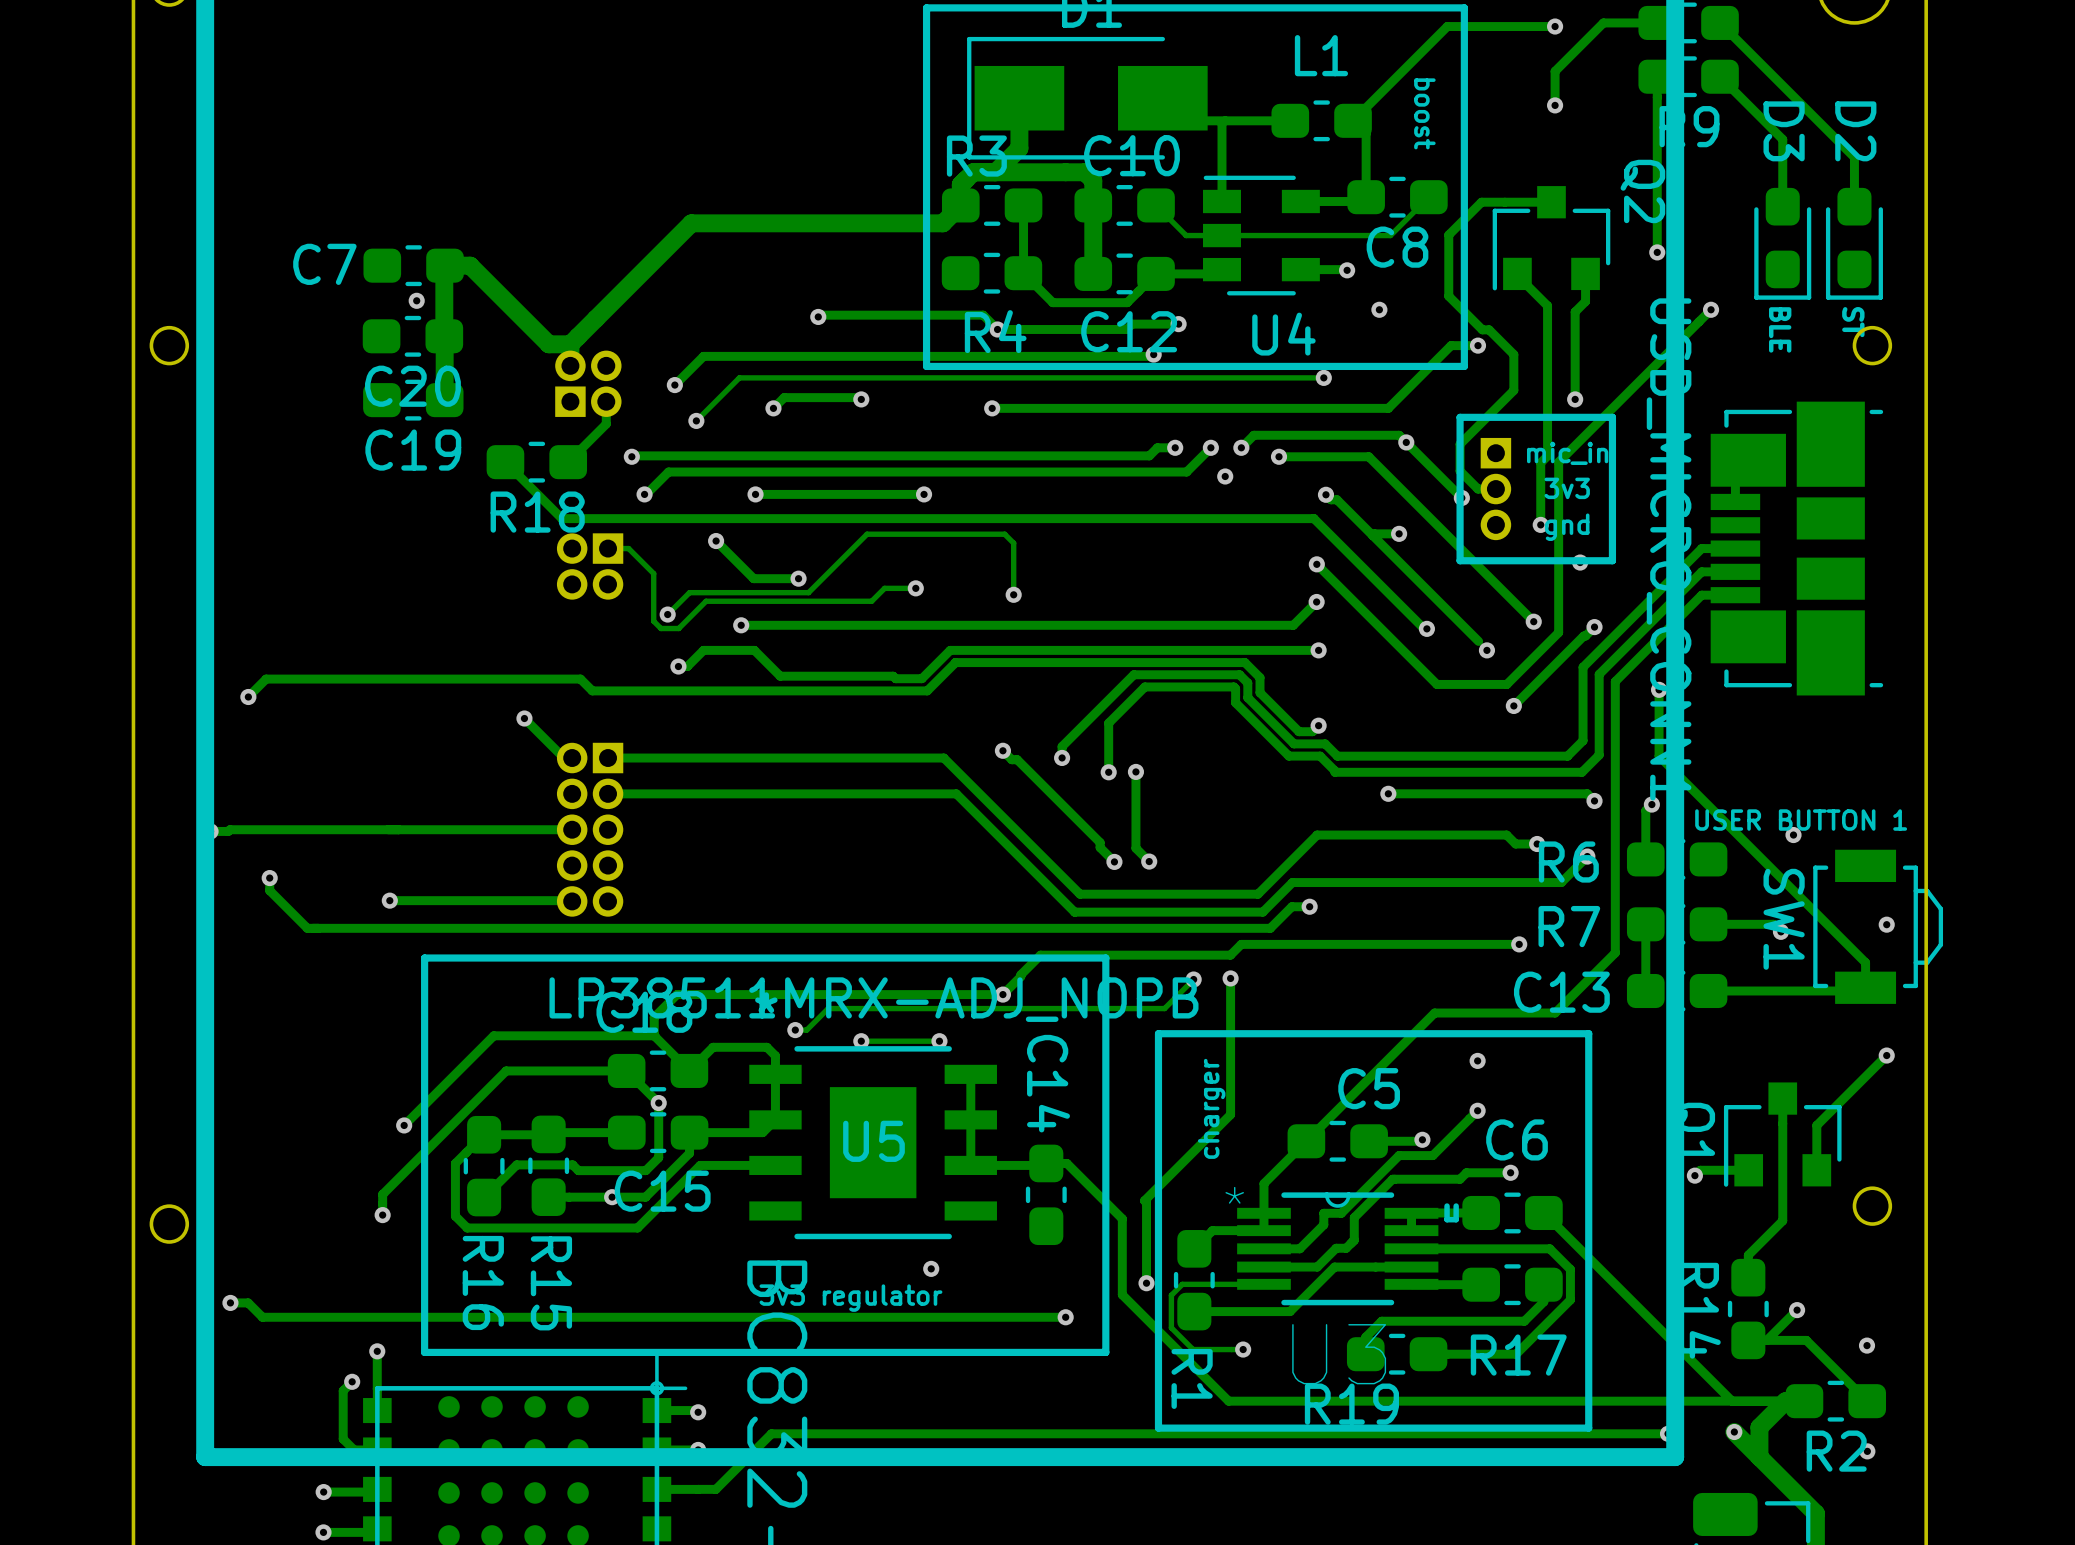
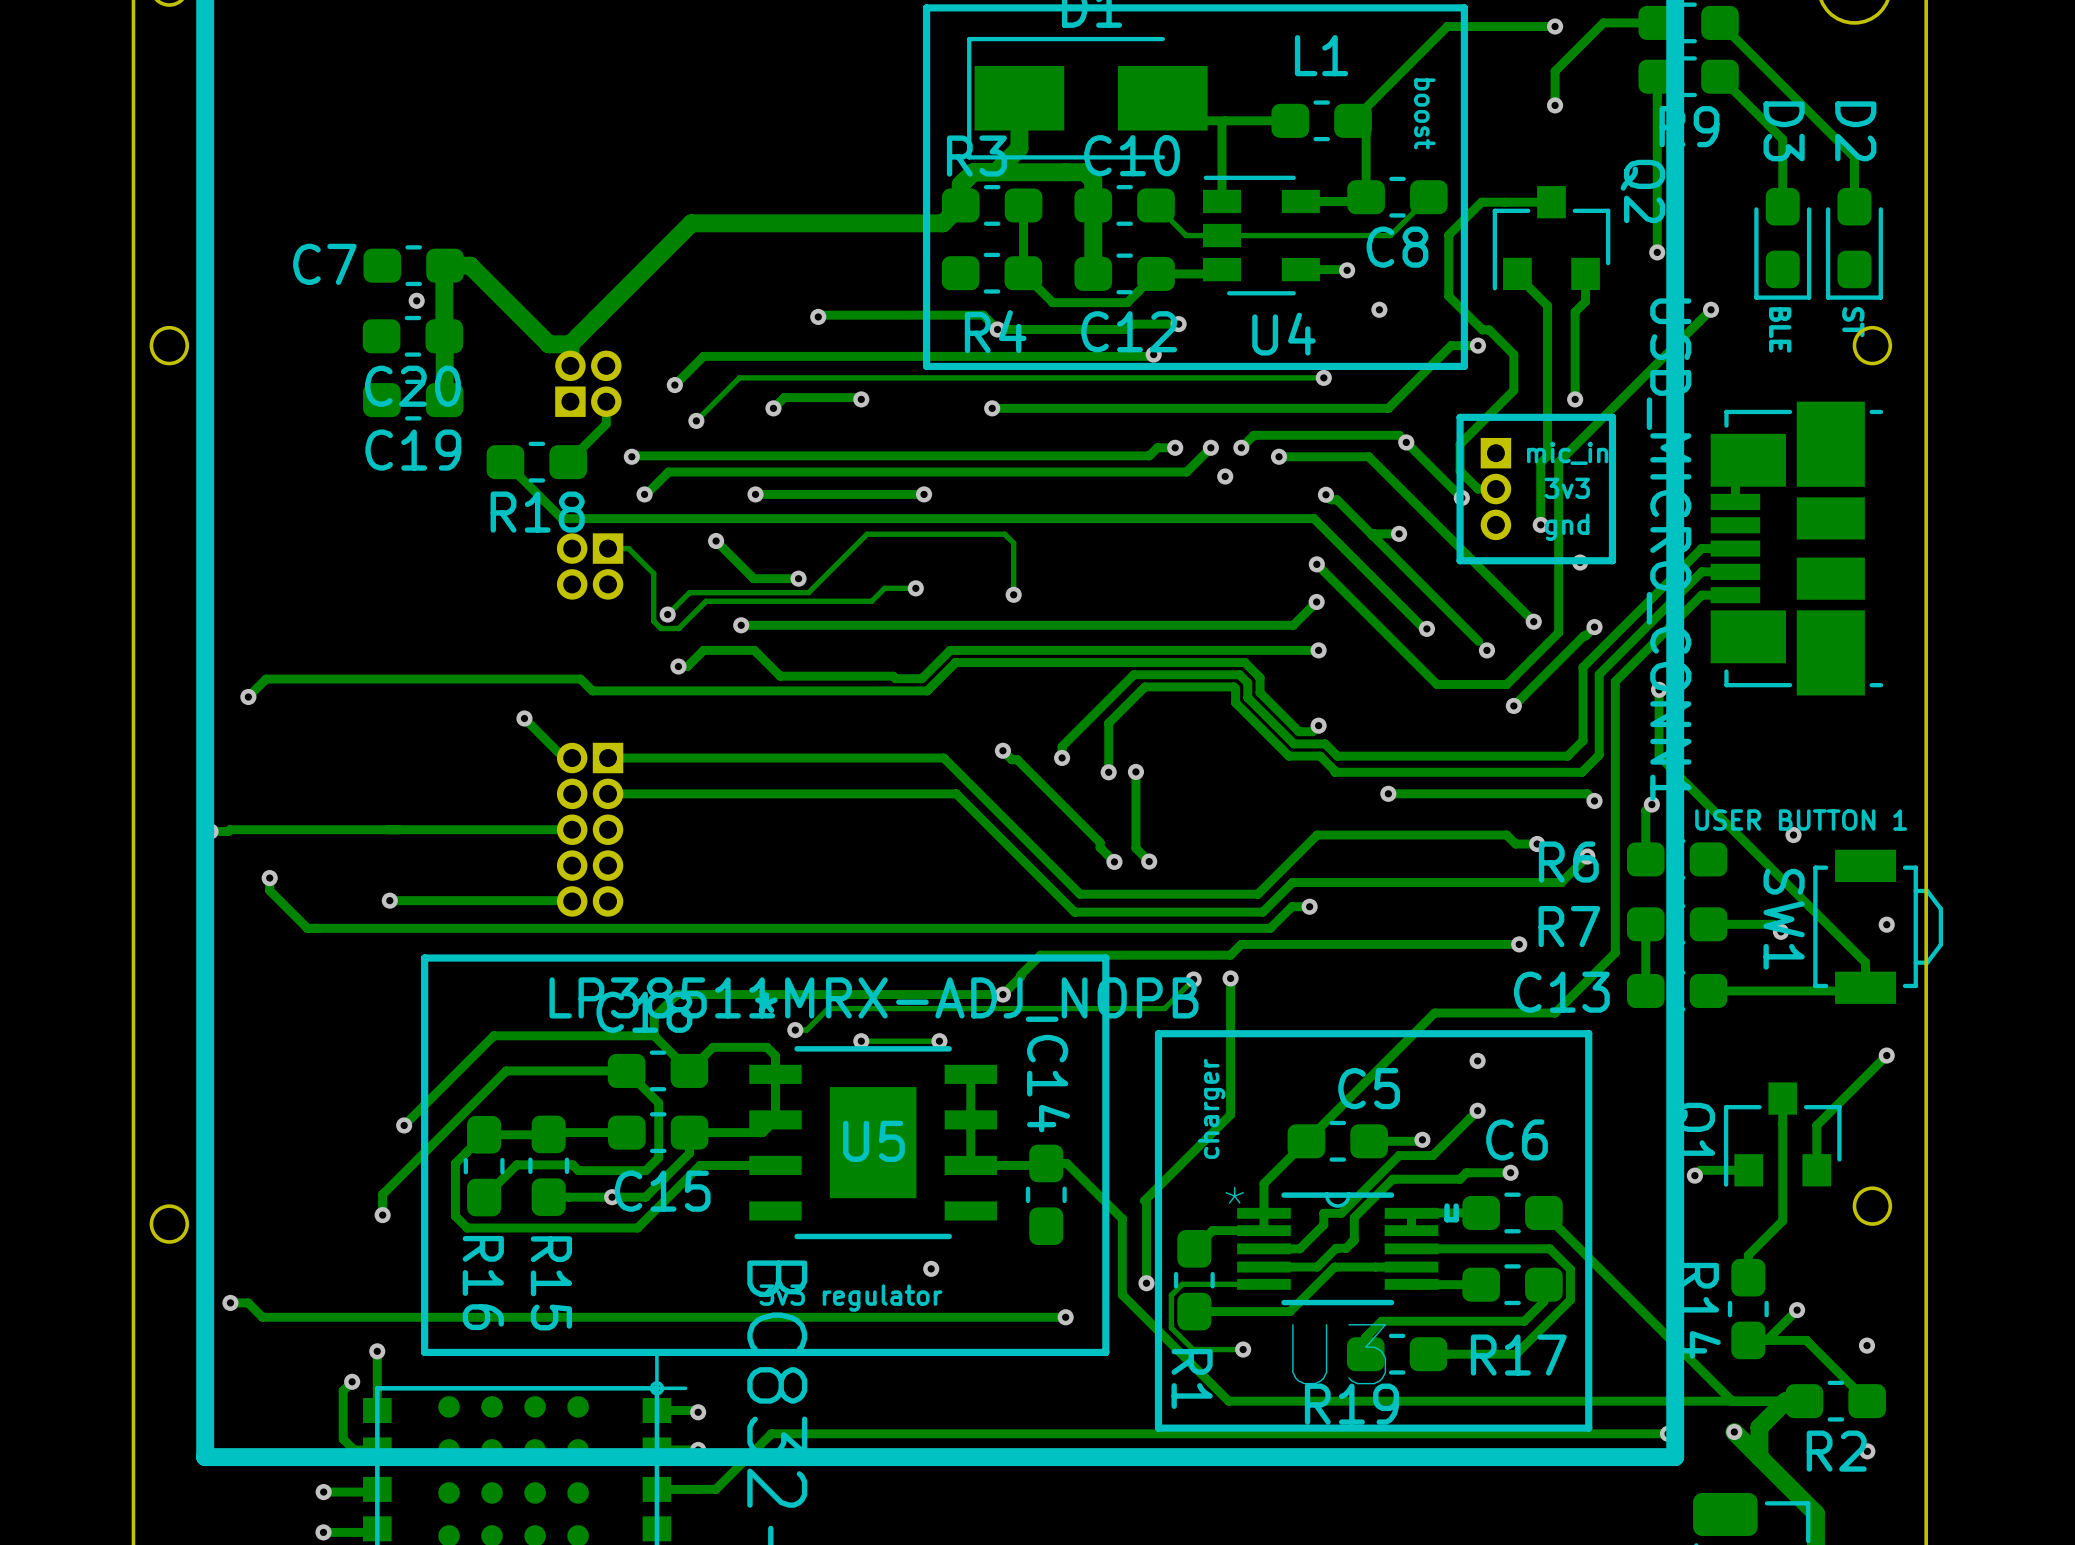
via: (658, 1103) -> none

